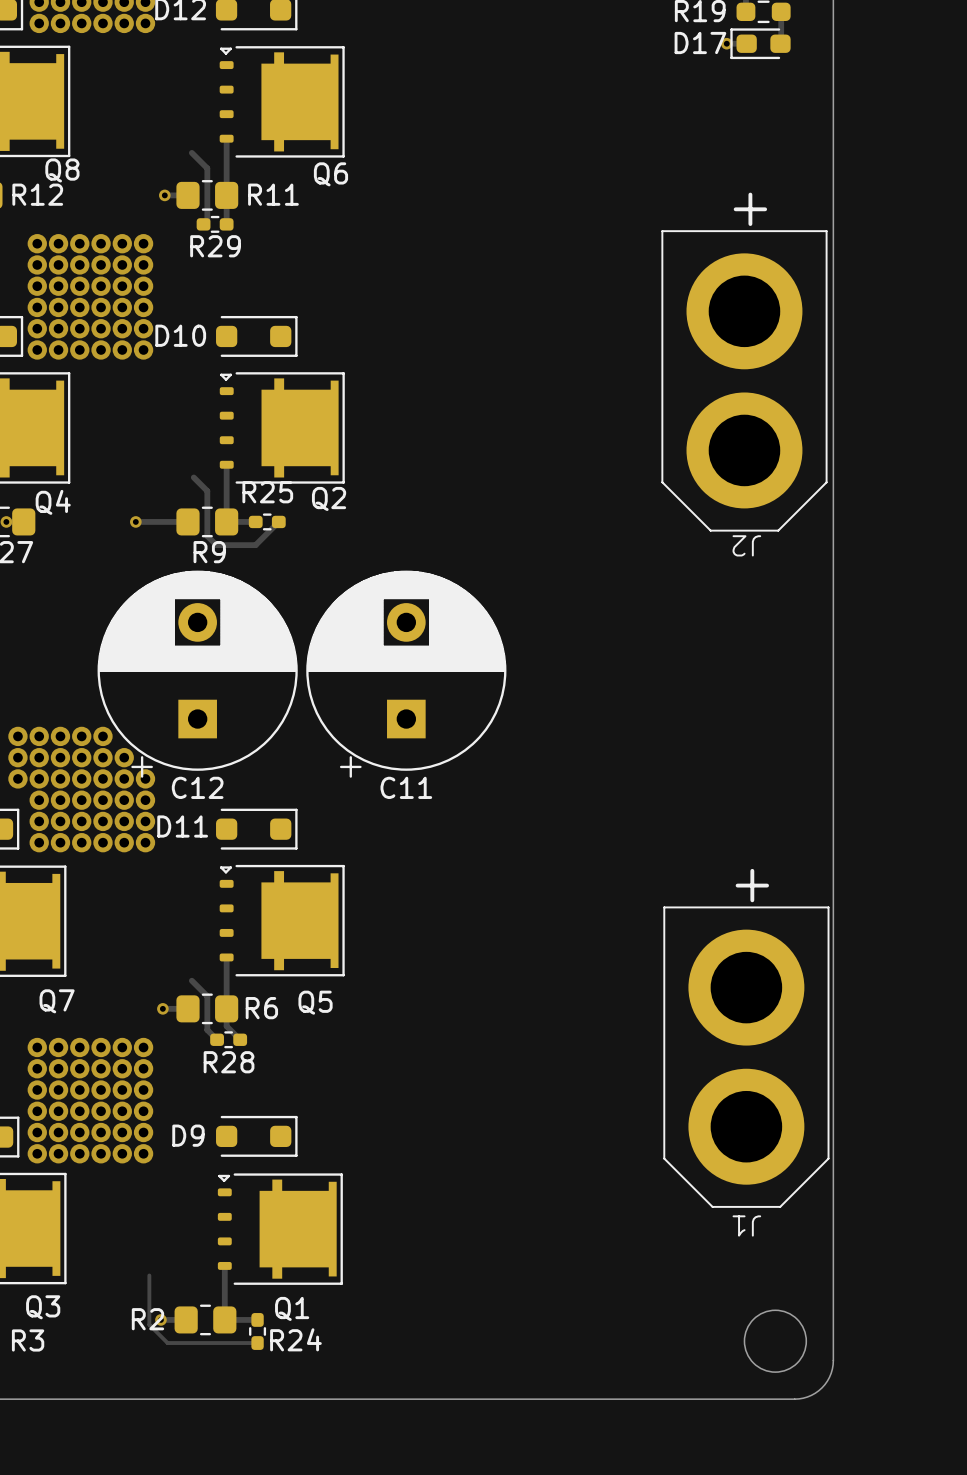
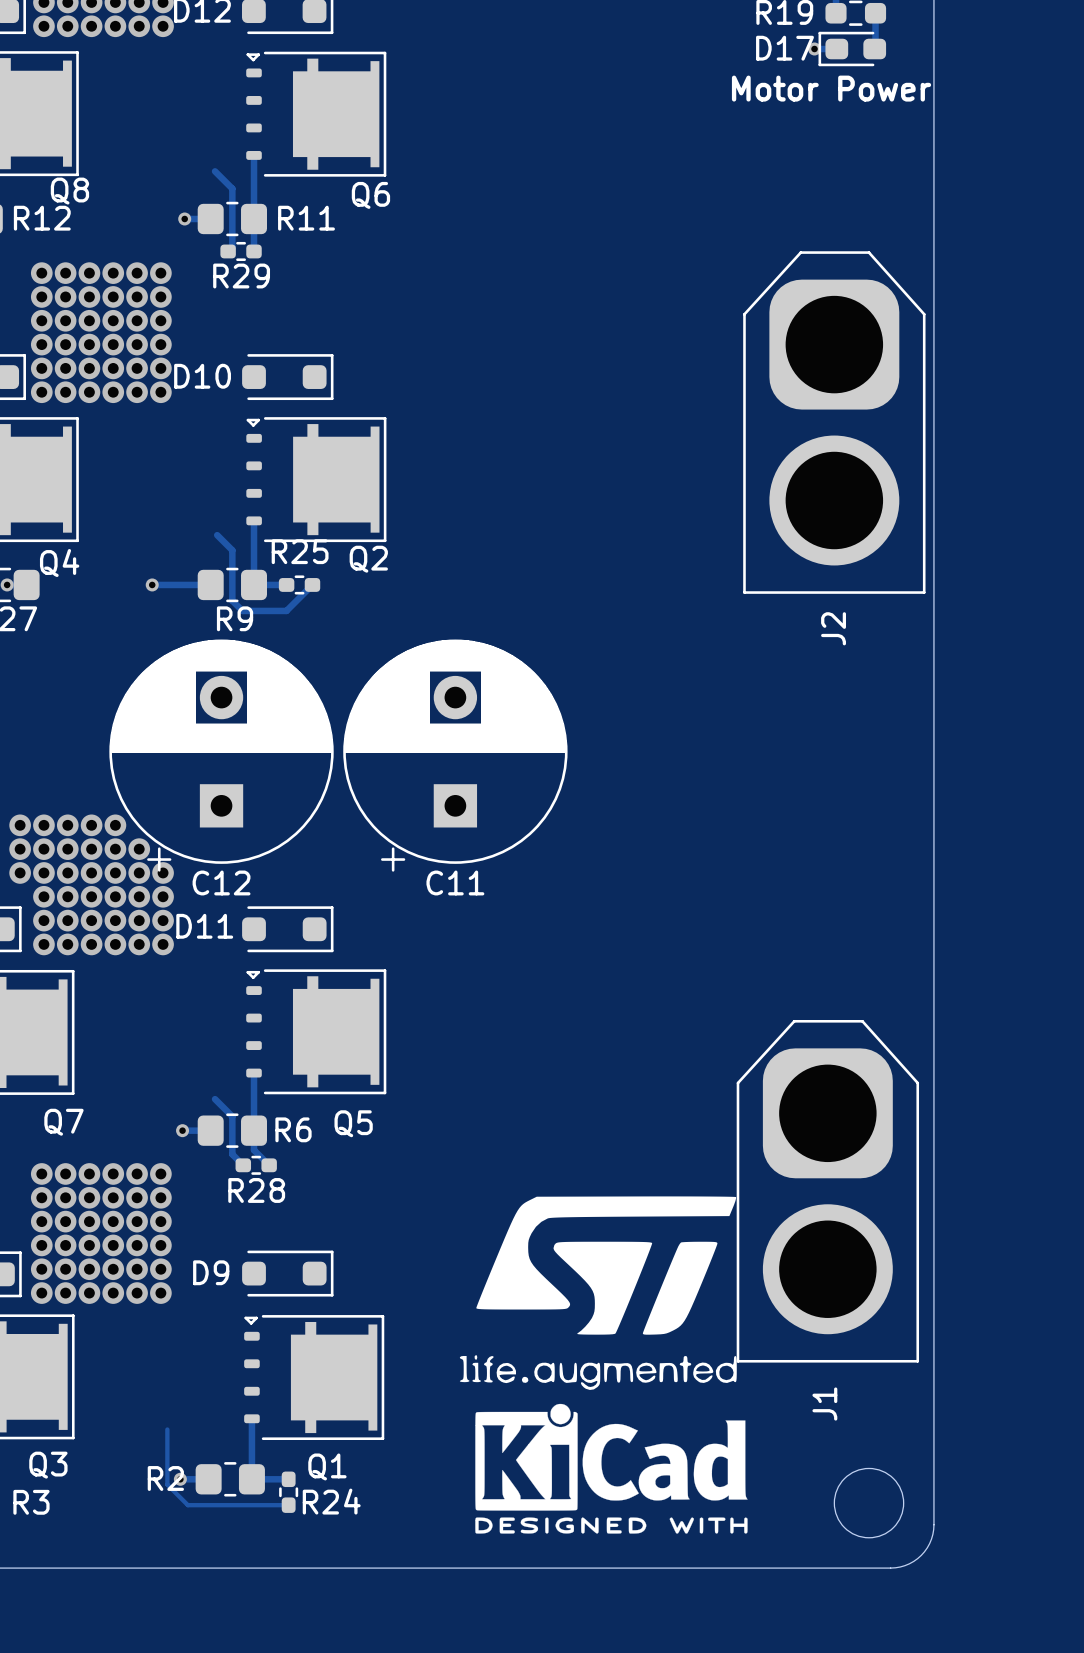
text: none -> Motor Power (831, 88)
J2 footprint: [661, 230, 828, 532] -> [743, 251, 926, 594]
J1 footprint: [663, 906, 830, 1208] -> [736, 1020, 920, 1363]
drawing: none -> [459, 1196, 748, 1534]

